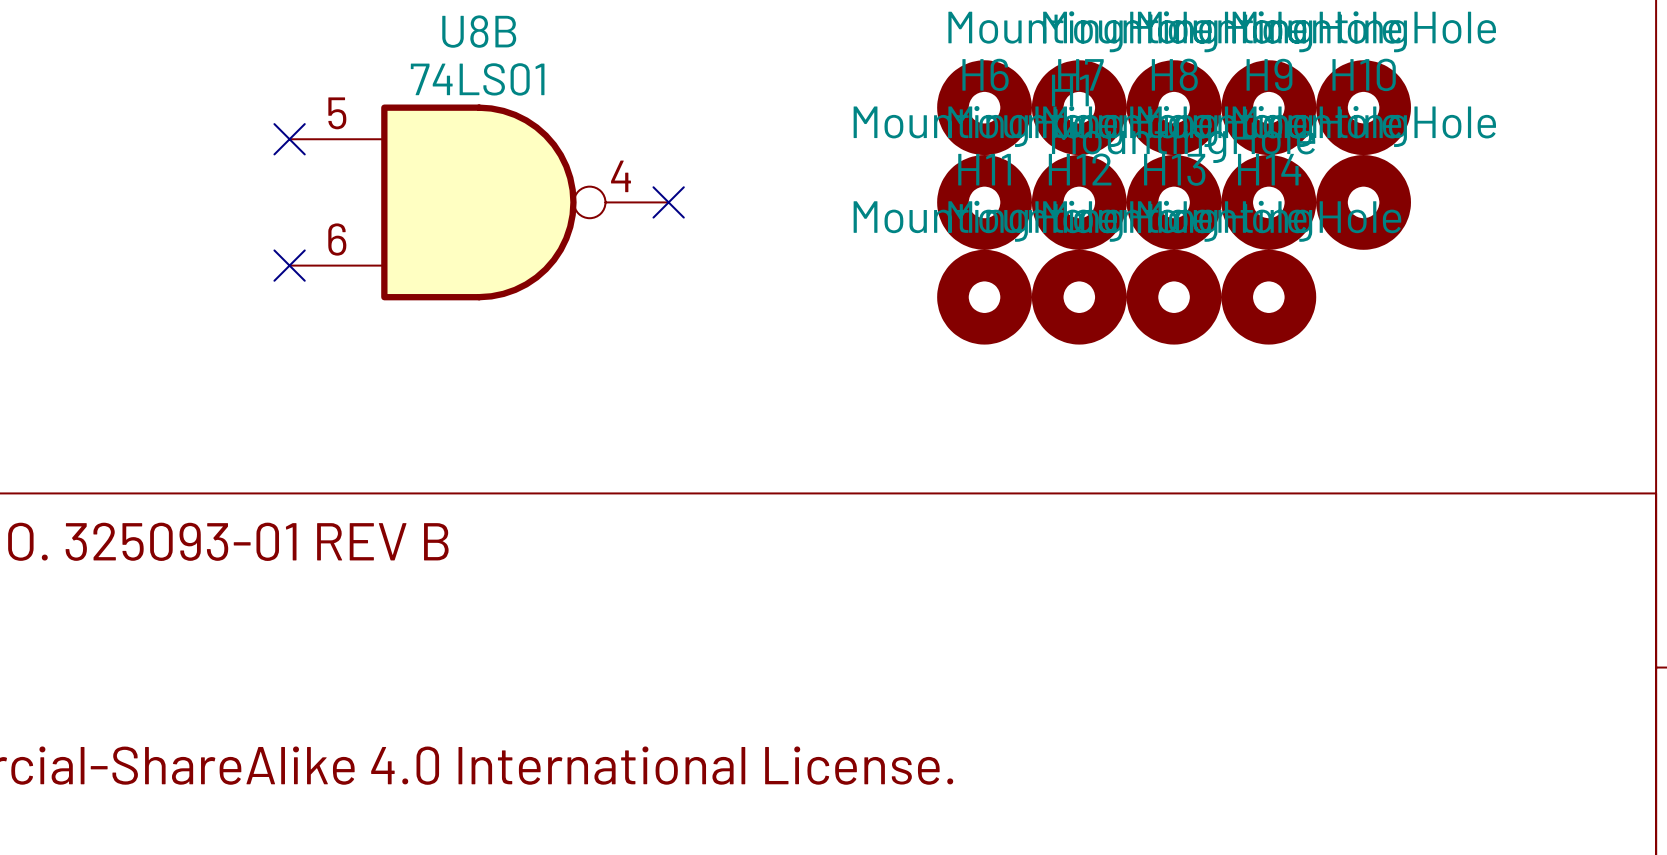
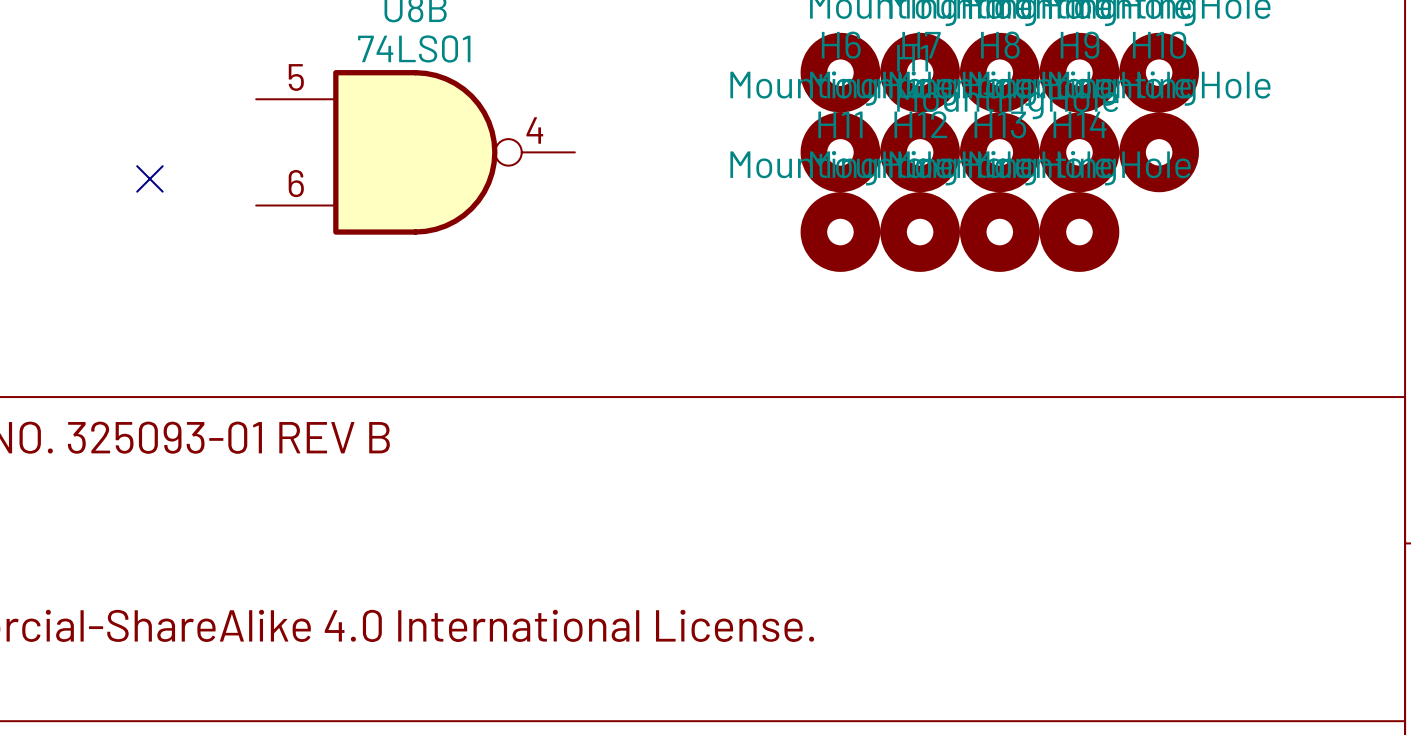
no-connect mark: (289, 139) -> none
no-connect mark: (668, 202) -> none
no-connect mark: none -> (149, 178)
no-connect mark: (289, 265) -> none

